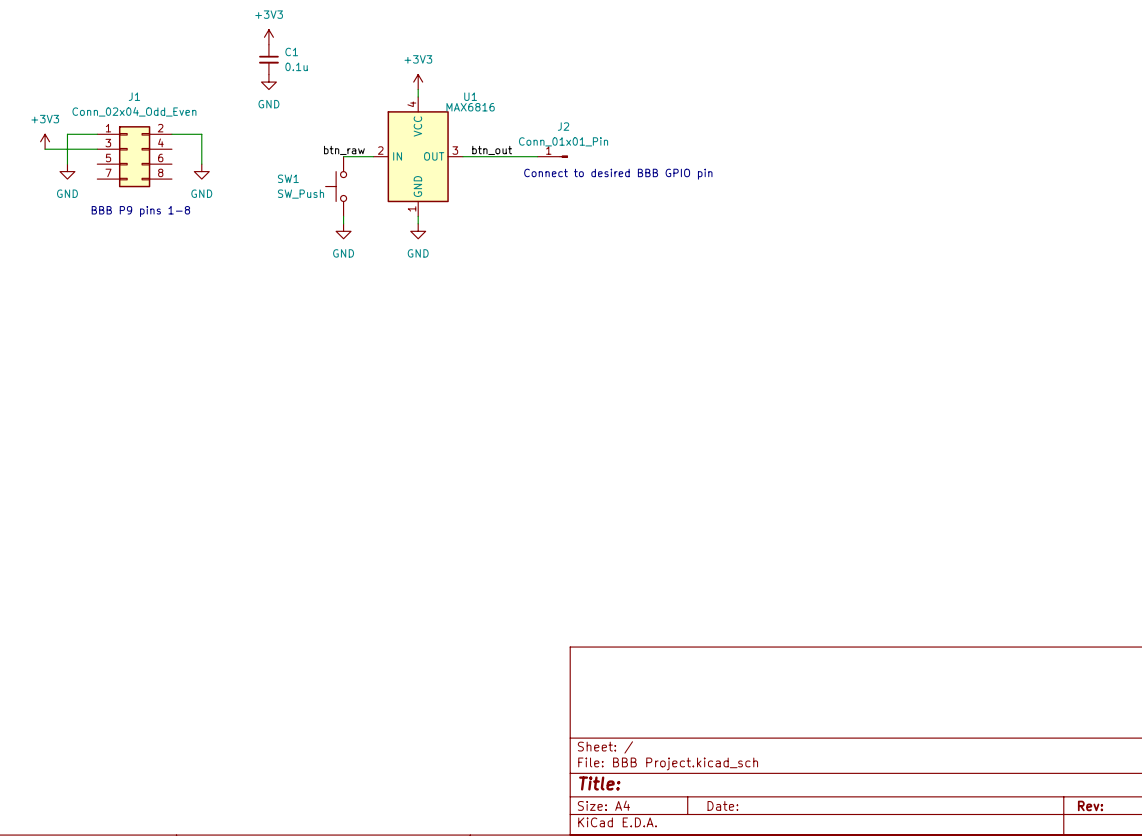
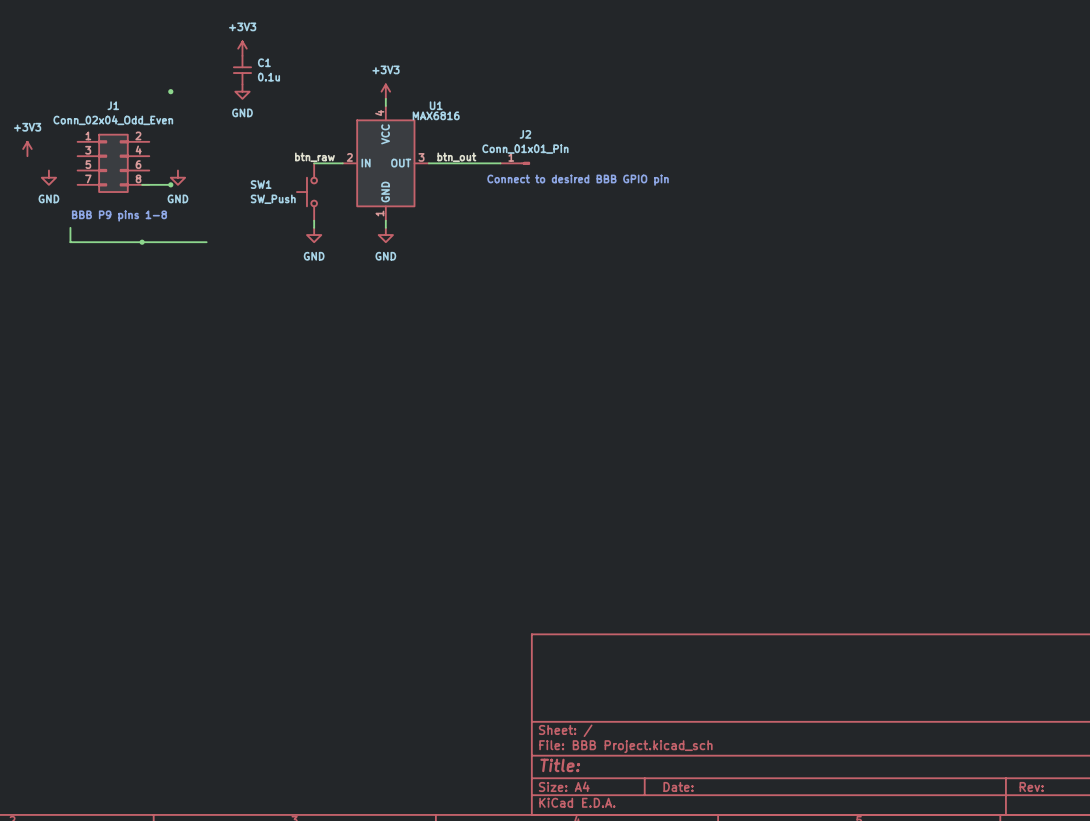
junction: none -> (170, 91)
wire: (97, 134) (67, 134) (67, 164) -> none
wire: (171, 134) (201, 134) (201, 164) -> none
wire: (45, 149) (97, 149) -> none
wire: none -> (142, 184) (170, 184)
junction: none -> (170, 184)
wire: none -> (70, 227) (70, 242) (206, 242)
junction: none -> (142, 242)

